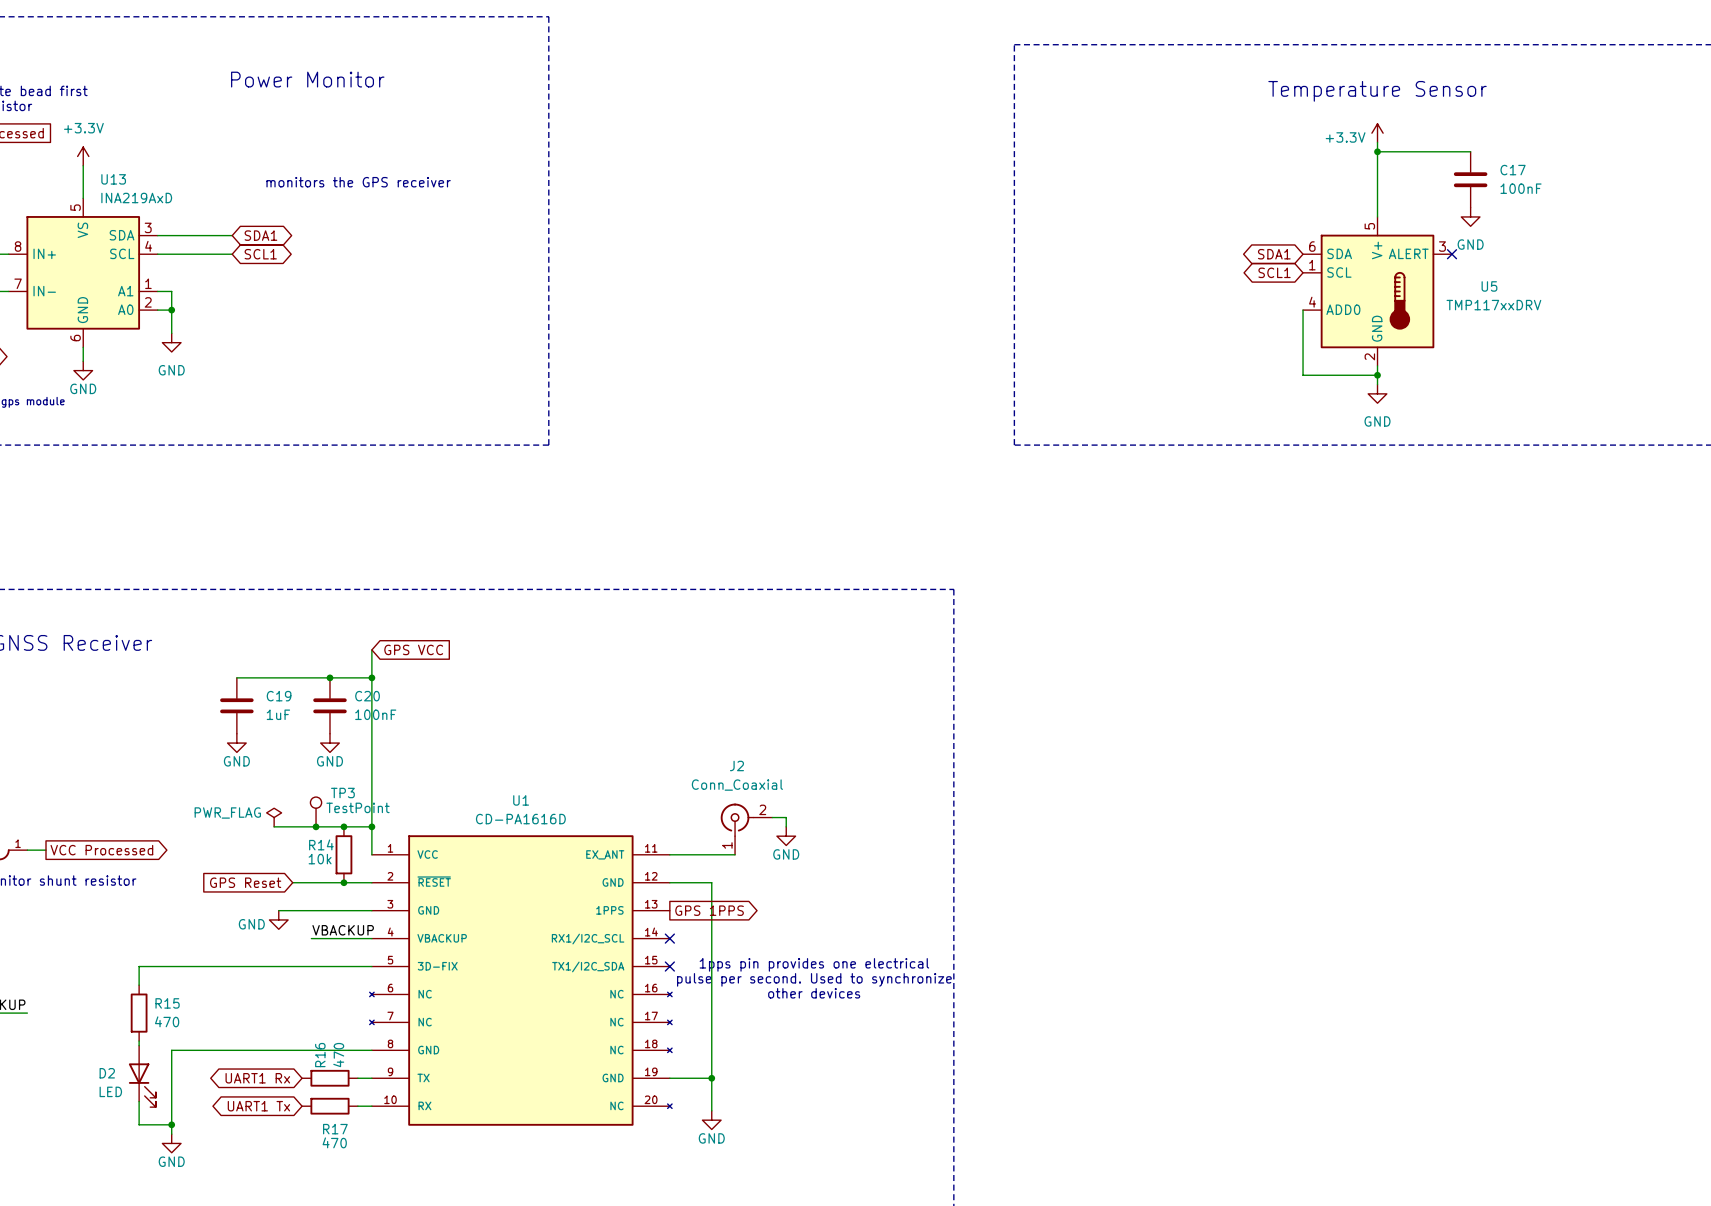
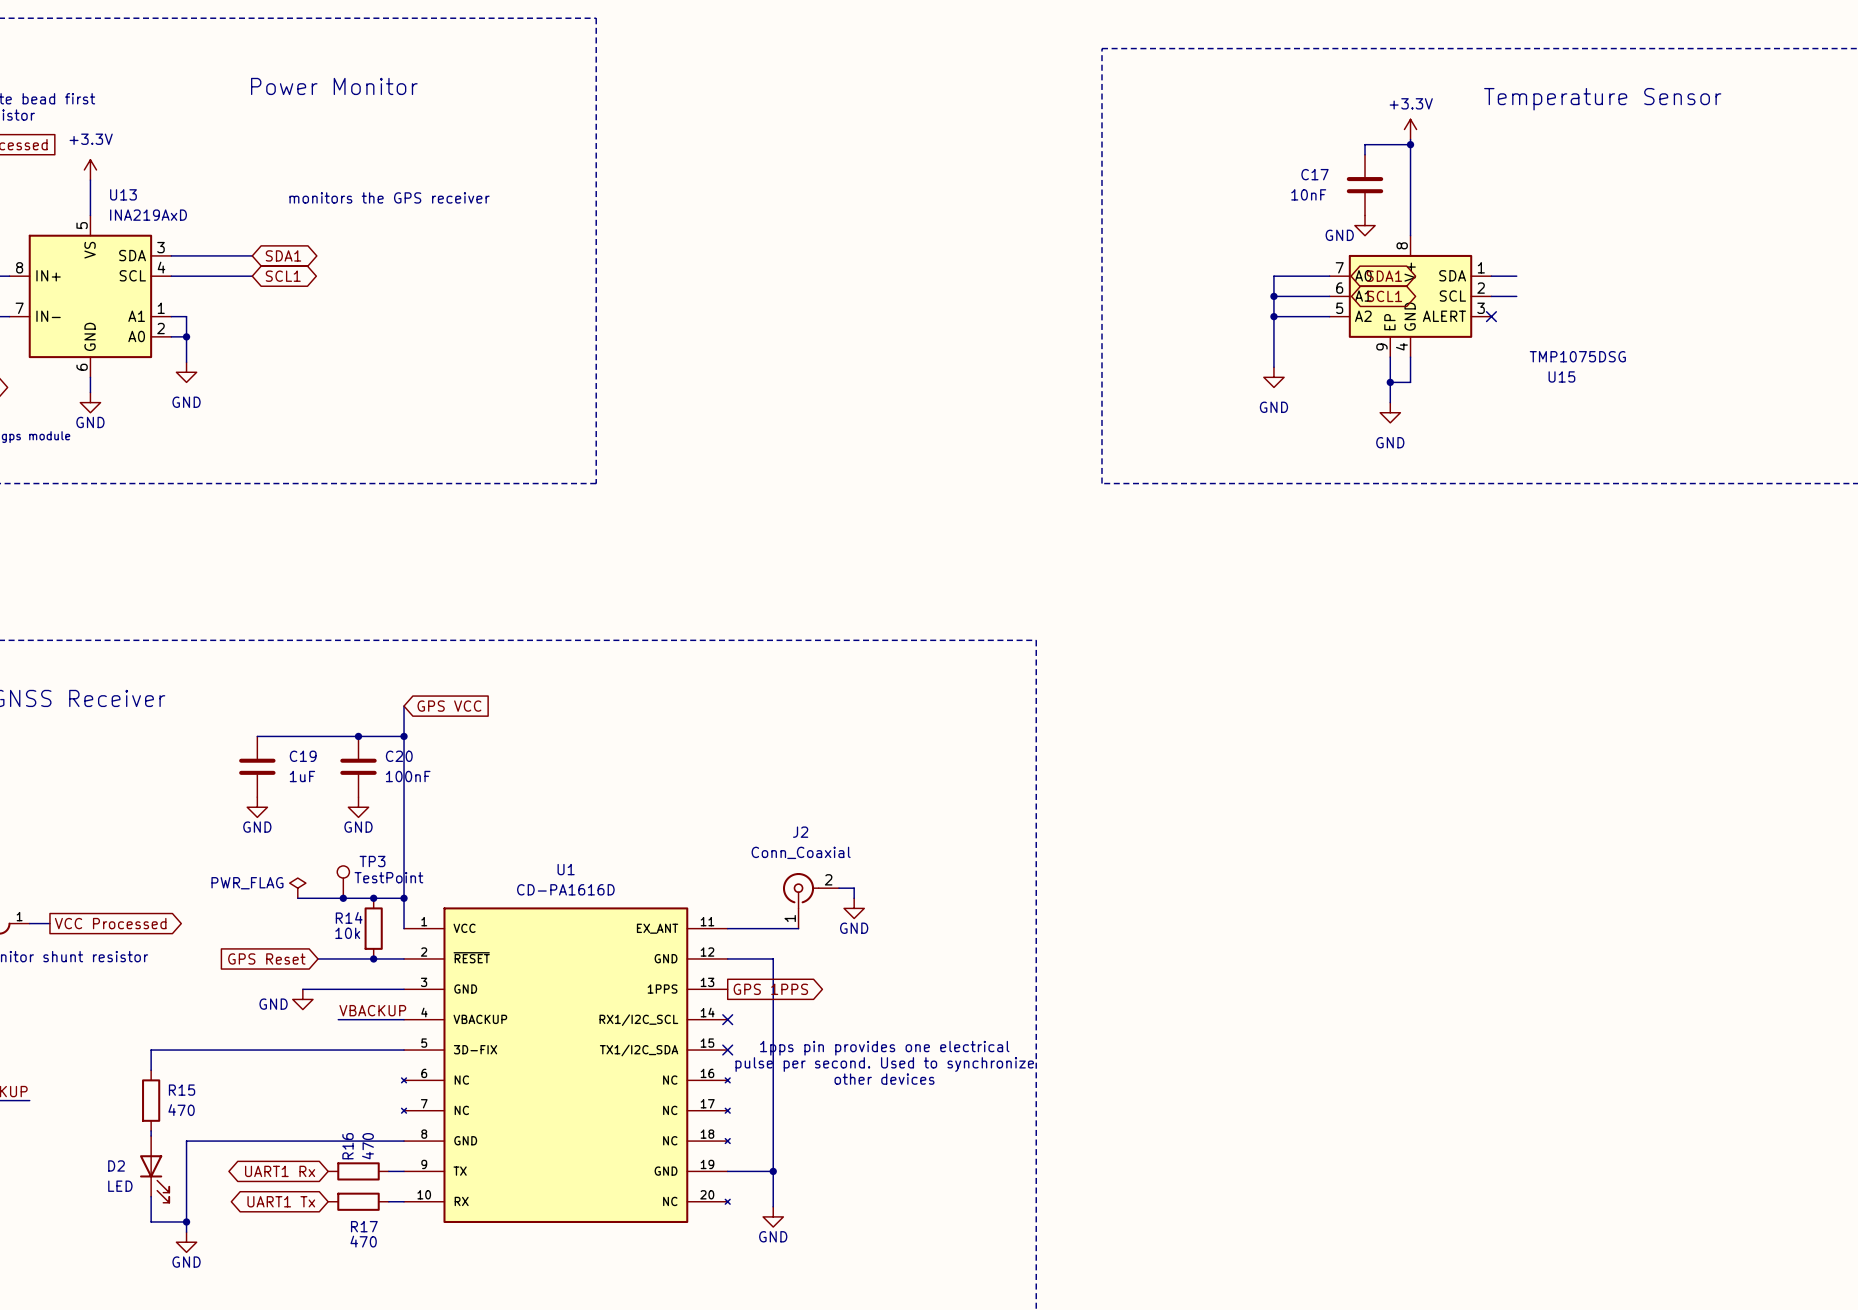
text position: Temperature Sensor (1377, 91) -> Temperature Sensor (1602, 99)
wire: none -> (1410, 139) (1410, 235)
wire: none -> (1410, 144) (1365, 144) (1365, 154)
junction: none -> (1410, 144)
power symbol position: +3.3V (1377, 133) -> +3.3V (1410, 129)
power symbol text position: +3.3V (1345, 137) -> +3.3V (1411, 103)
wire: (1377, 142) (1377, 216) -> none
wire: (1377, 151) (1470, 151) -> none
junction: (1377, 151) -> none
C17 name position: C17 (1513, 170) -> C17 (1314, 174)
C17 position: (1470, 179) -> (1365, 185)
C17 value: 100nF (1521, 188) -> 10nF (1308, 194)
power symbol: none -> GND (1365, 225)
power symbol: GND (1470, 216) -> none
wire: none -> (1329, 276) (1273, 276) (1273, 367)
no-connect mark: (1452, 254) -> none
wire: none -> (1273, 296) (1329, 296)
junction: none -> (1273, 296)
U15: none -> TMP1075DSG (1410, 296)
wire: none -> (1273, 316) (1329, 316)
junction: none -> (1273, 316)
no-connect mark: none -> (1491, 316)
U5: TMP117xxDRV (1377, 291) -> none
wire: (1303, 310) (1303, 375) (1377, 375) -> none
wire: none -> (1390, 357) (1390, 402)
wire: none -> (1410, 357) (1410, 382) (1390, 382)
power symbol: none -> GND (1273, 377)
junction: none -> (1390, 382)
wire: (1377, 365) (1377, 384) -> none
junction: (1377, 375) -> none
power symbol position: GND (1377, 393) -> GND (1390, 412)

